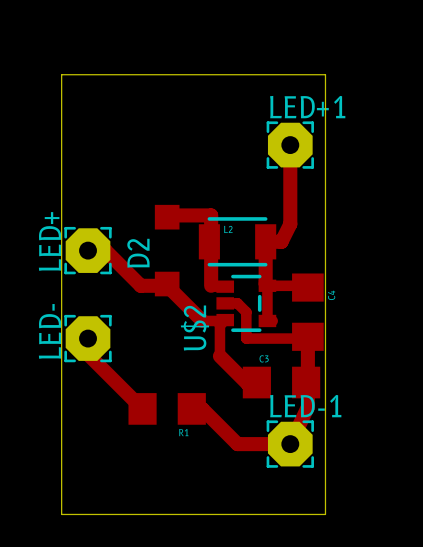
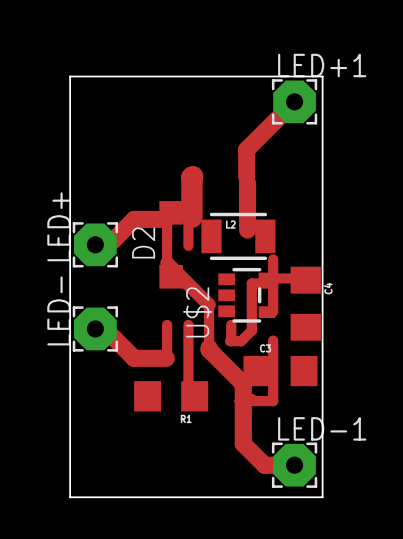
track: none -> (294, 101) (246, 149) (247, 230)
track: (290, 145) (290, 224) (281, 241) (265, 241) (267, 320) (272, 320) -> none
LED+1 position: (290, 145) -> (294, 101)
track: none -> (192, 176) (191, 217) (188, 220) (188, 245)
track: (167, 215) (211, 215) (211, 285) (225, 286) -> none
track: none -> (91, 240) (112, 240) (134, 219) (167, 220) (167, 262) (209, 304) (209, 349) (243, 383) (243, 443) (264, 465) (294, 465)
track: (88, 250) (105, 250) (140, 285) (165, 285) (167, 284) -> none
track: none -> (273, 259) (273, 311)
track: (167, 285) (202, 320) (224, 320) -> none
track: none -> (273, 283) (251, 283) (251, 330) (241, 341) (230, 341) (231, 324)
track: (225, 303) (237, 303) (246, 312) (246, 338) (299, 338) (307, 347) -> none
track: (225, 320) (219, 325) (219, 356) (248, 384) (256, 382) -> none
track: none -> (167, 324) (166, 358) (134, 358) (102, 326) (91, 326)
track: none -> (188, 324) (188, 397) (198, 396) (196, 401)
track: (88, 338) (88, 354) (142, 408) -> none
track: (300, 338) (307, 336) (306, 382) (307, 382) (307, 407) (290, 444) (237, 444) (202, 408) (191, 408) -> none
track: none -> (273, 340) (273, 401) (243, 401) (251, 398)
LED-1 position: (290, 444) -> (294, 465)

